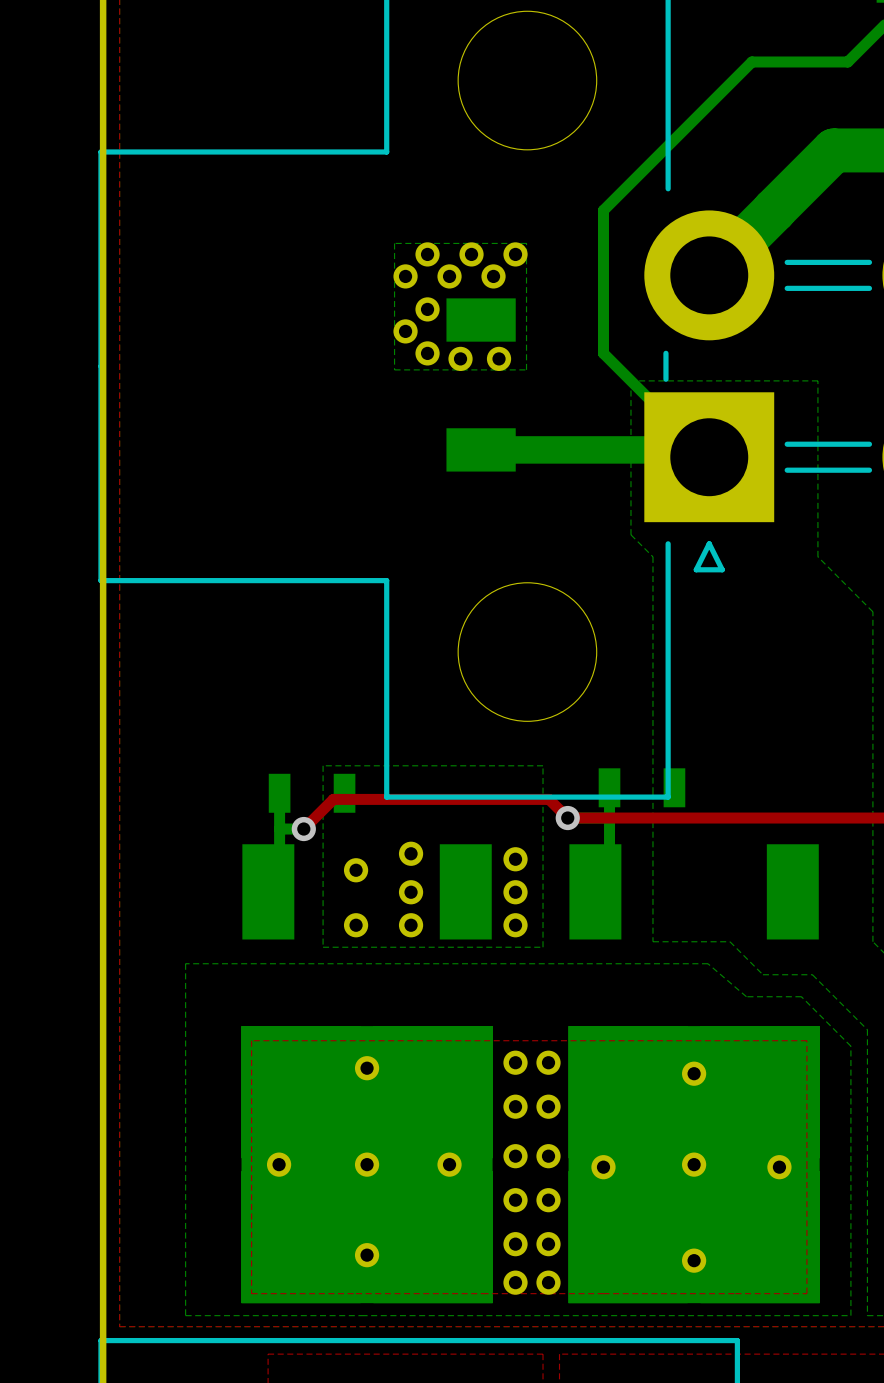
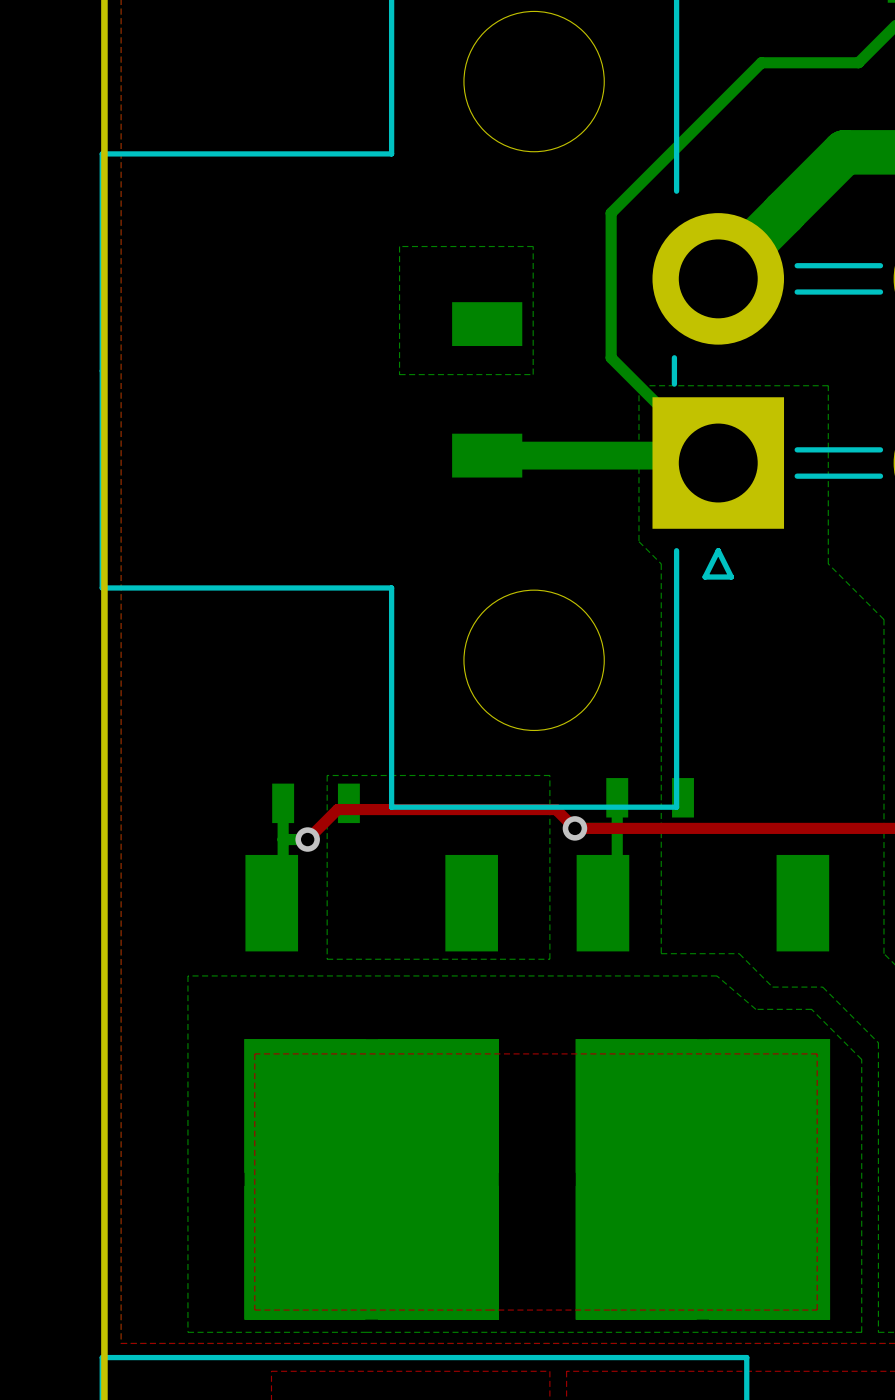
part: (427, 254) -> none
part: (471, 254) -> none
part: (515, 254) -> none
part: (405, 276) -> none
part: (449, 276) -> none
part: (493, 276) -> none
part: (427, 309) -> none
part: (405, 331) -> none
part: (427, 353) -> none
part: (460, 358) -> none
part: (499, 358) -> none
part: (411, 853) -> none
part: (515, 859) -> none
part: (356, 870) -> none
part: (411, 892) -> none
part: (515, 892) -> none
part: (356, 925) -> none
part: (411, 925) -> none
part: (515, 925) -> none
part: (515, 1062) -> none
part: (548, 1062) -> none
part: (367, 1068) -> none
part: (694, 1073) -> none
part: (515, 1106) -> none
part: (548, 1106) -> none
part: (515, 1156) -> none
part: (548, 1156) -> none
part: (279, 1164) -> none
part: (367, 1164) -> none
part: (449, 1164) -> none
part: (694, 1164) -> none
part: (603, 1167) -> none
part: (779, 1167) -> none
part: (515, 1200) -> none
part: (548, 1200) -> none
part: (515, 1244) -> none
part: (548, 1244) -> none
part: (367, 1255) -> none
part: (694, 1260) -> none
part: (515, 1282) -> none
part: (548, 1282) -> none

